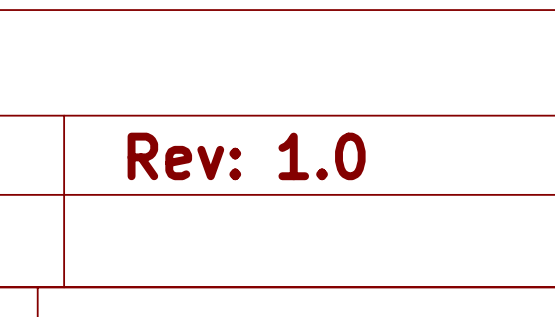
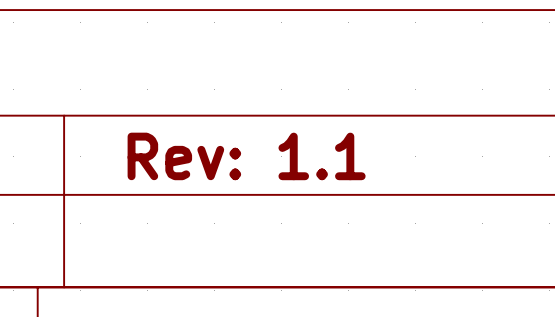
title block: Rev: 1.0 (246, 156) -> Rev: 1.1 (246, 156)

